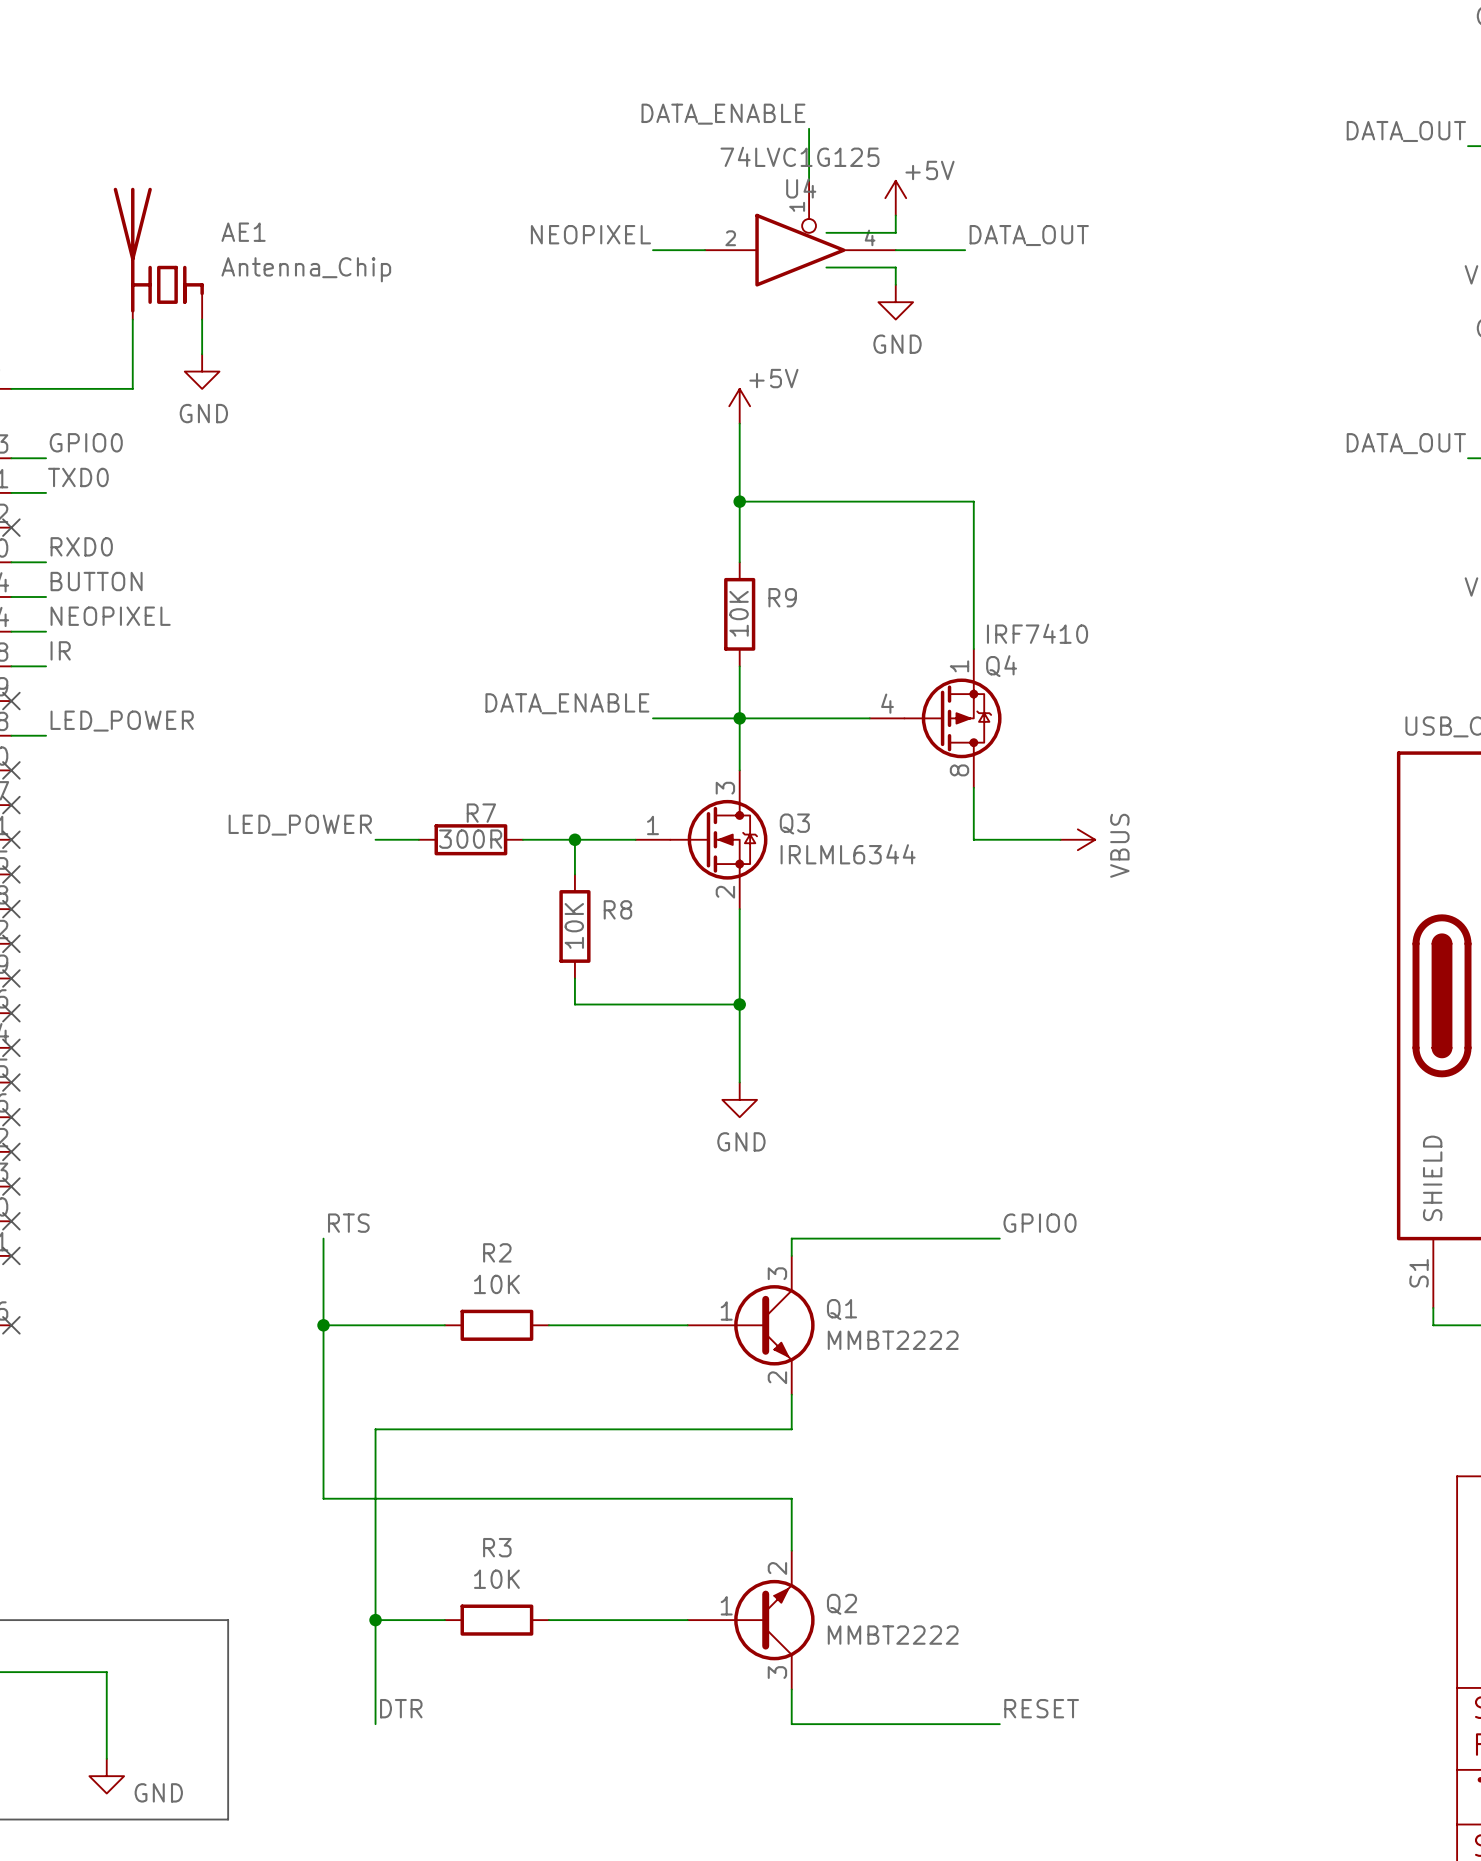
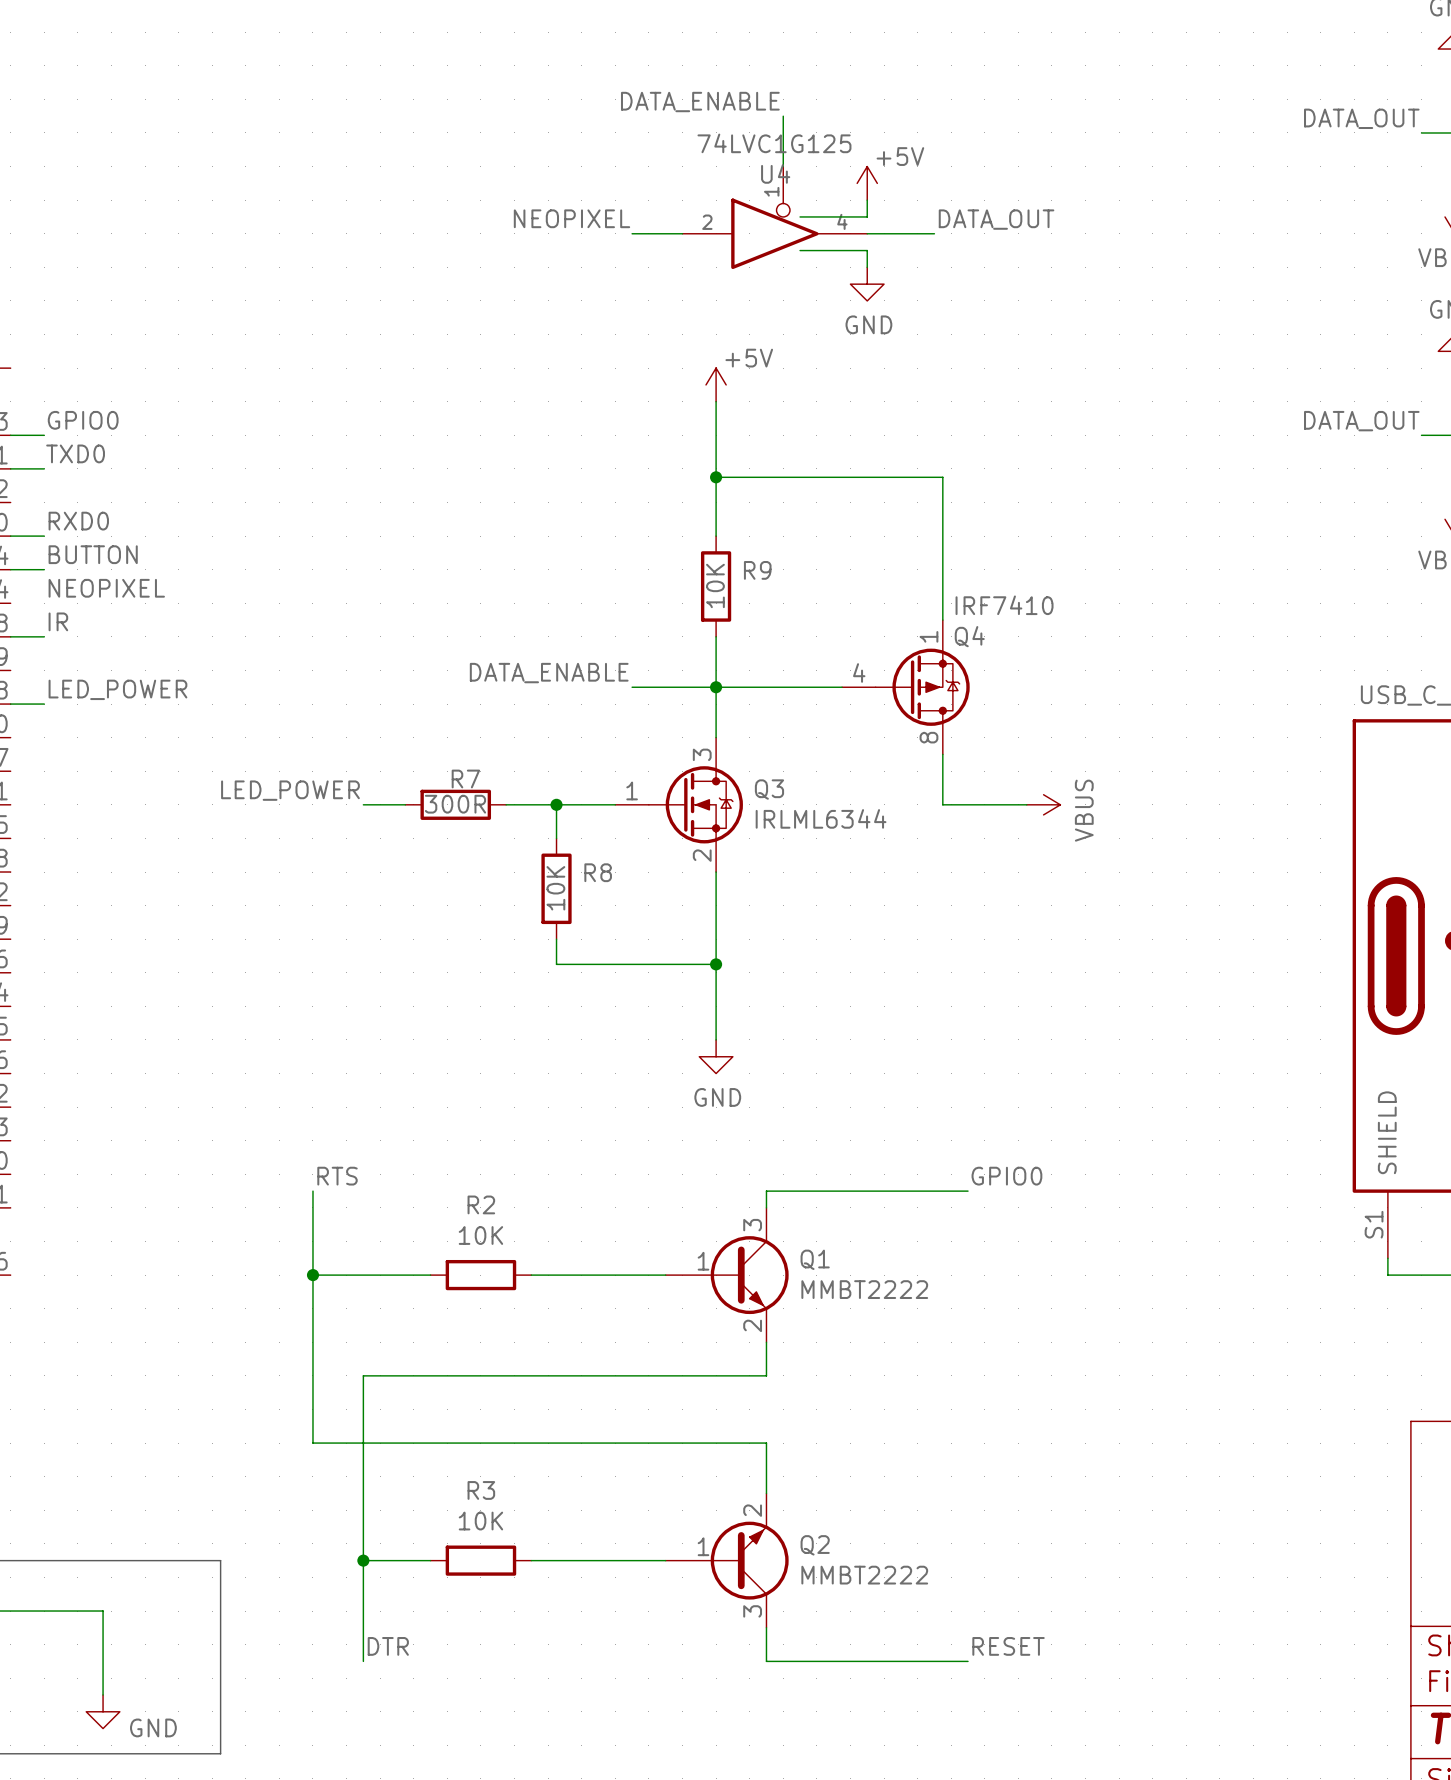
AE1: Antenna_Chip (158, 253) -> none
wire: (132, 319) (132, 388) (11, 388) -> none
wire: (202, 319) (202, 354) -> none
power symbol: GND (202, 371) -> none
no-connect mark: (11, 527) -> none
wire: (11, 631) (46, 631) -> none
no-connect mark: (11, 701) -> none
no-connect mark: (11, 770) -> none
no-connect mark: (11, 805) -> none
no-connect mark: (11, 839) -> none
no-connect mark: (11, 874) -> none
no-connect mark: (11, 909) -> none
no-connect mark: (11, 943) -> none
no-connect mark: (11, 978) -> none
no-connect mark: (11, 1013) -> none
no-connect mark: (11, 1047) -> none
no-connect mark: (11, 1082) -> none
no-connect mark: (11, 1117) -> none
no-connect mark: (11, 1151) -> none
no-connect mark: (11, 1186) -> none
no-connect mark: (11, 1221) -> none
no-connect mark: (11, 1255) -> none
no-connect mark: (11, 1325) -> none

